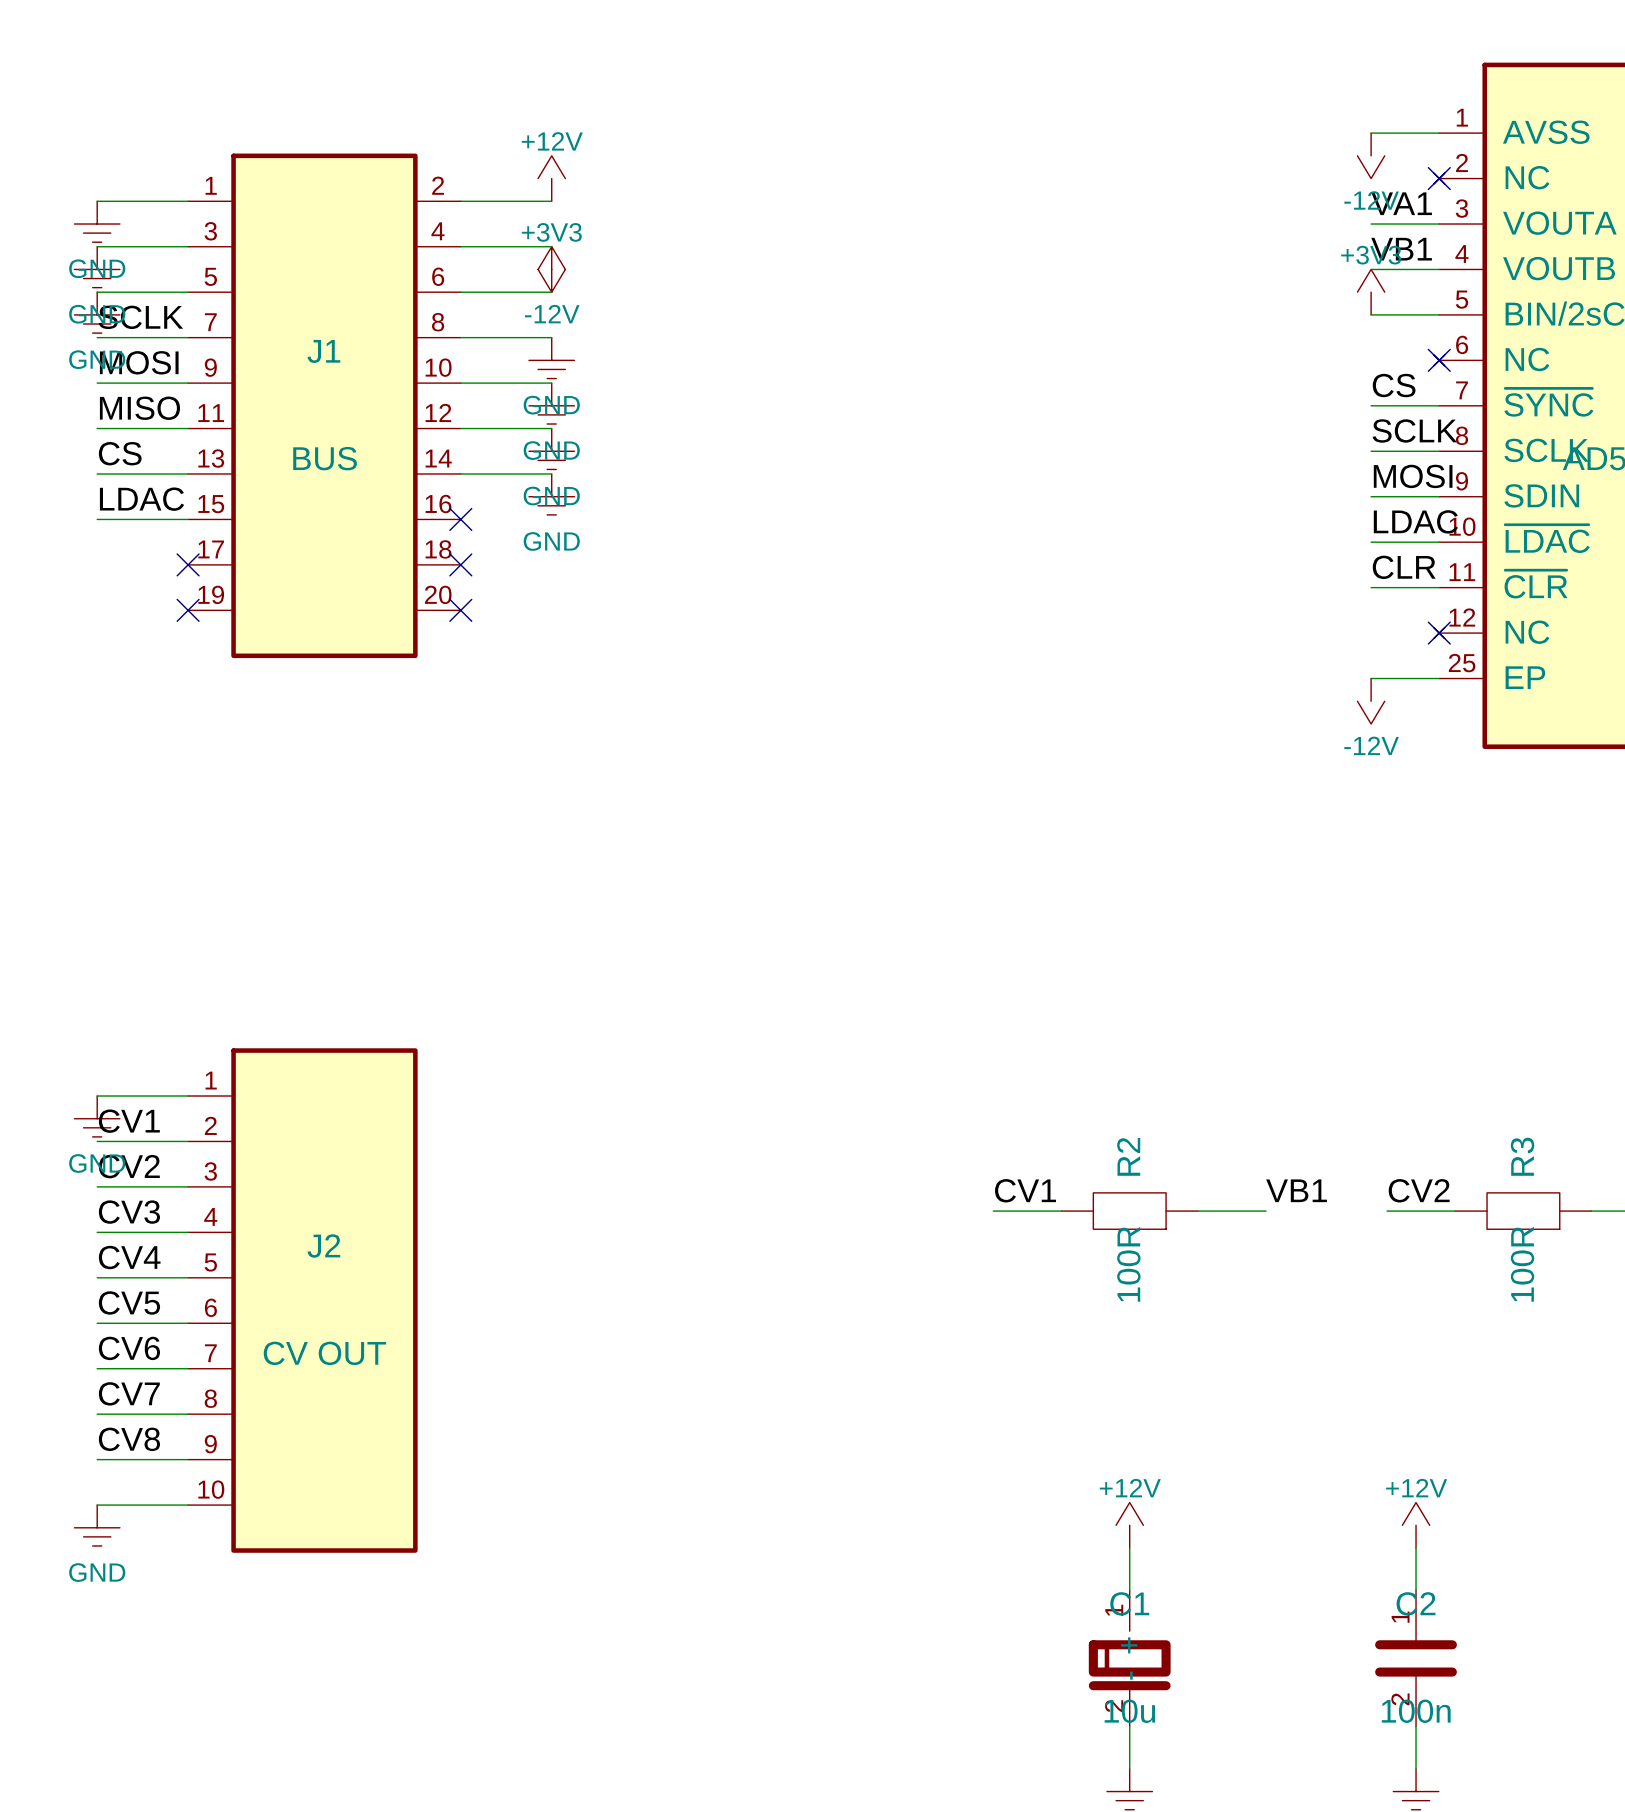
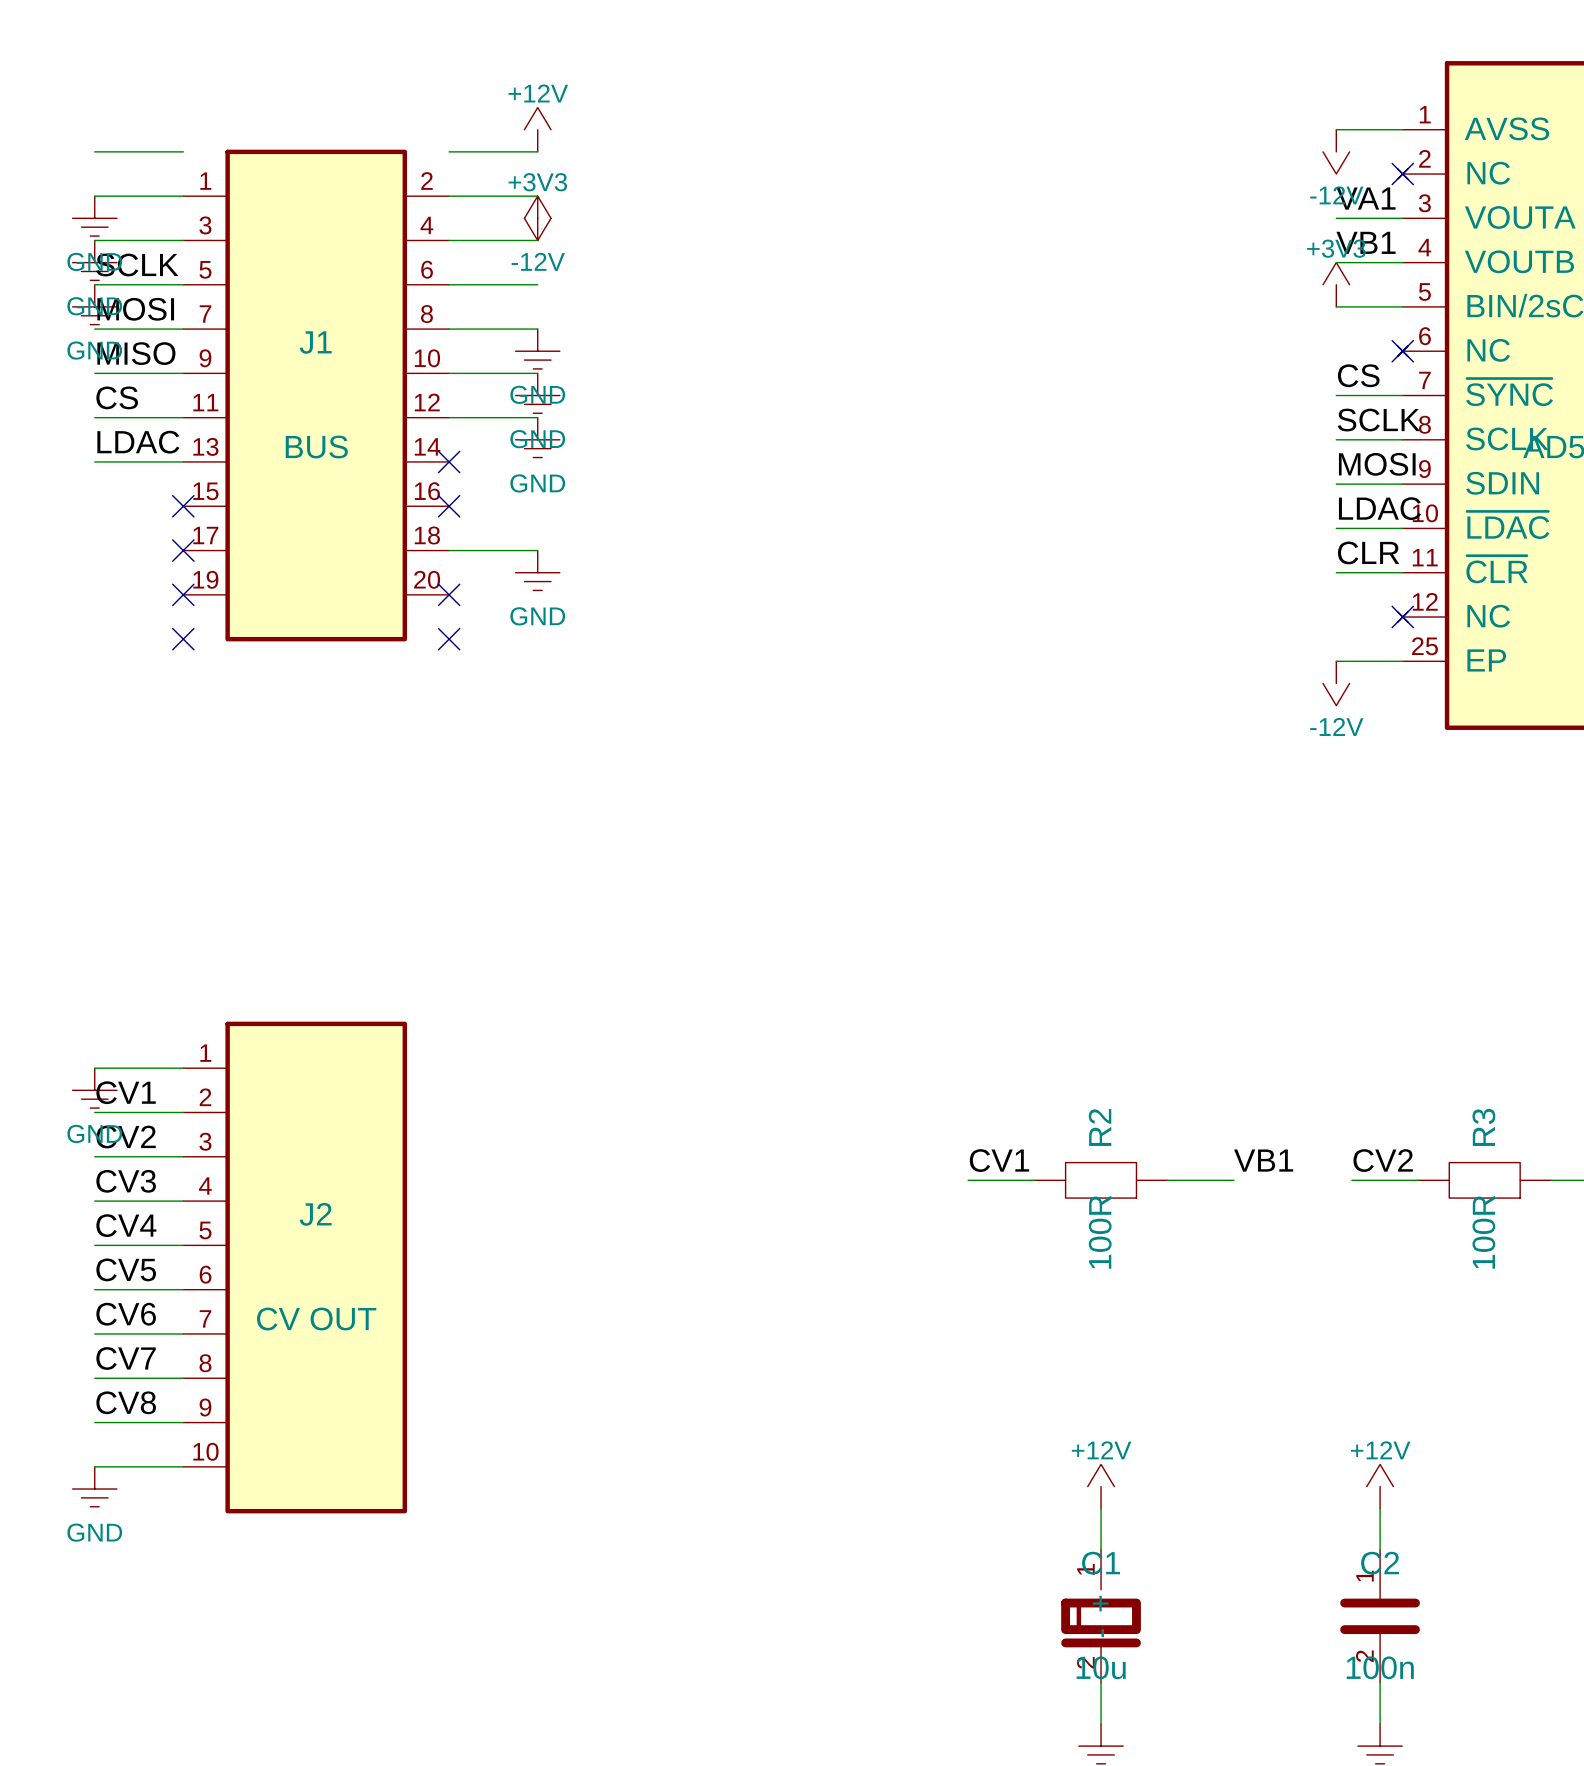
wire: none -> (449, 151) (537, 151)
power symbol position: +12V (551, 178) -> +12V (537, 129)
power symbol position: -12V (551, 269) -> -12V (537, 218)
power symbol position: +3V3 (551, 269) -> +3V3 (537, 218)
label: none -> SCLK (137, 265)
label: SCLK (140, 317) -> MOSI (135, 309)
label: MOSI (139, 362) -> MISO (136, 353)
label: MISO (139, 408) -> CS (117, 397)
label: CS (120, 453) -> LDAC (138, 442)
wire: (460, 473) (551, 473) -> (449, 550) (537, 550)
no-connect mark: none -> (449, 461)
power symbol position: GND (551, 494) -> GND (537, 570)
label: LDAC (141, 499) -> none
wire: (97, 519) (188, 519) -> (94, 151) (183, 151)
no-connect mark: none -> (183, 506)
no-connect mark: (460, 564) -> none
no-connect mark: none -> (183, 639)
no-connect mark: none -> (449, 639)

